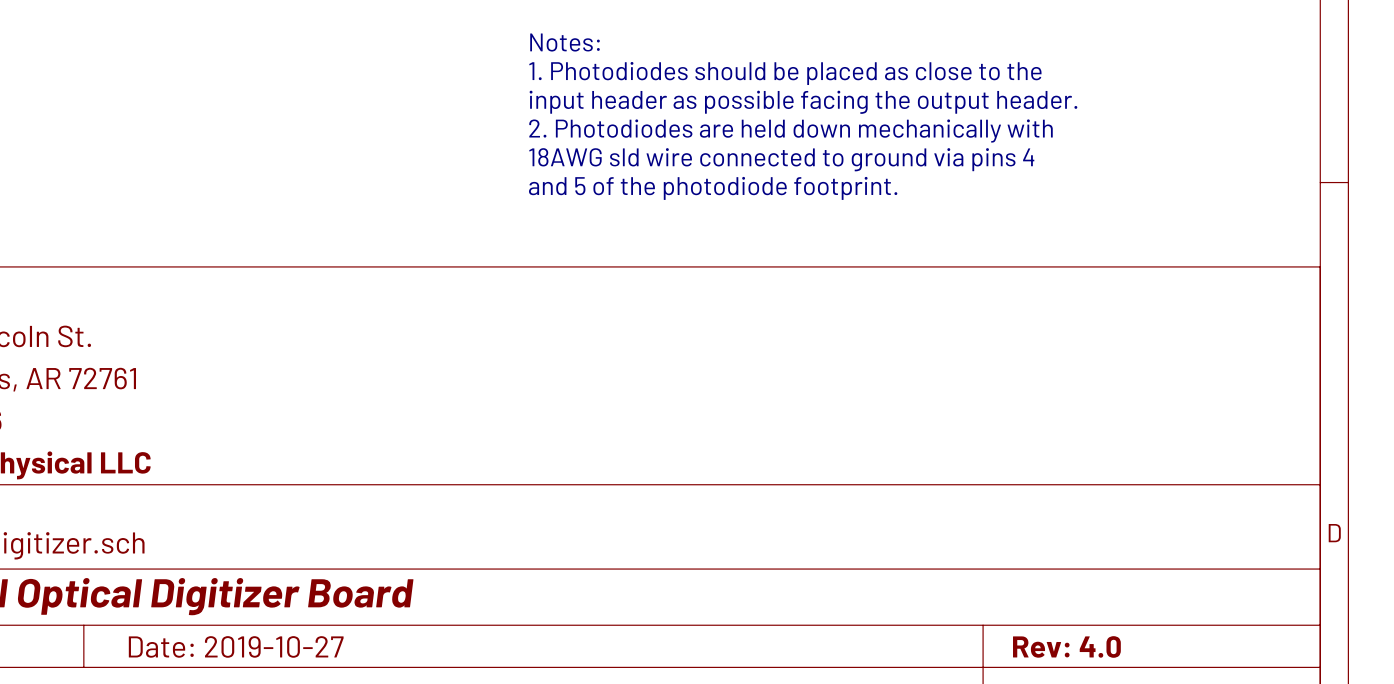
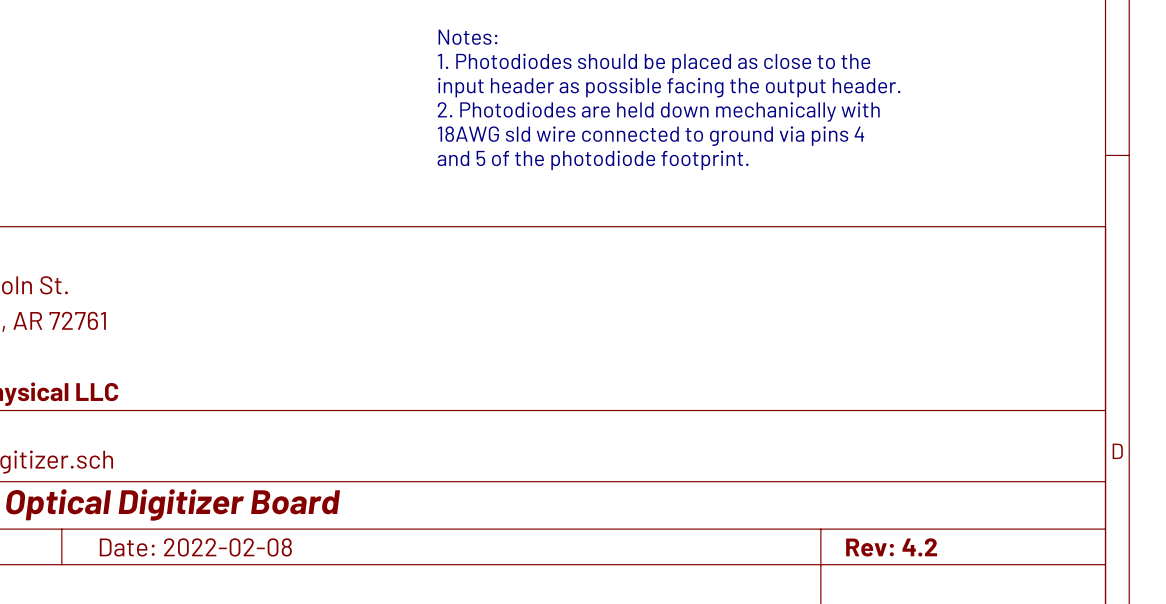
title block: Date: 2019-10-27 (236, 646) -> Date: 2022-02-08 (195, 547)
title block: Rev: 4.0 (1066, 646) -> Rev: 4.2 (891, 547)

